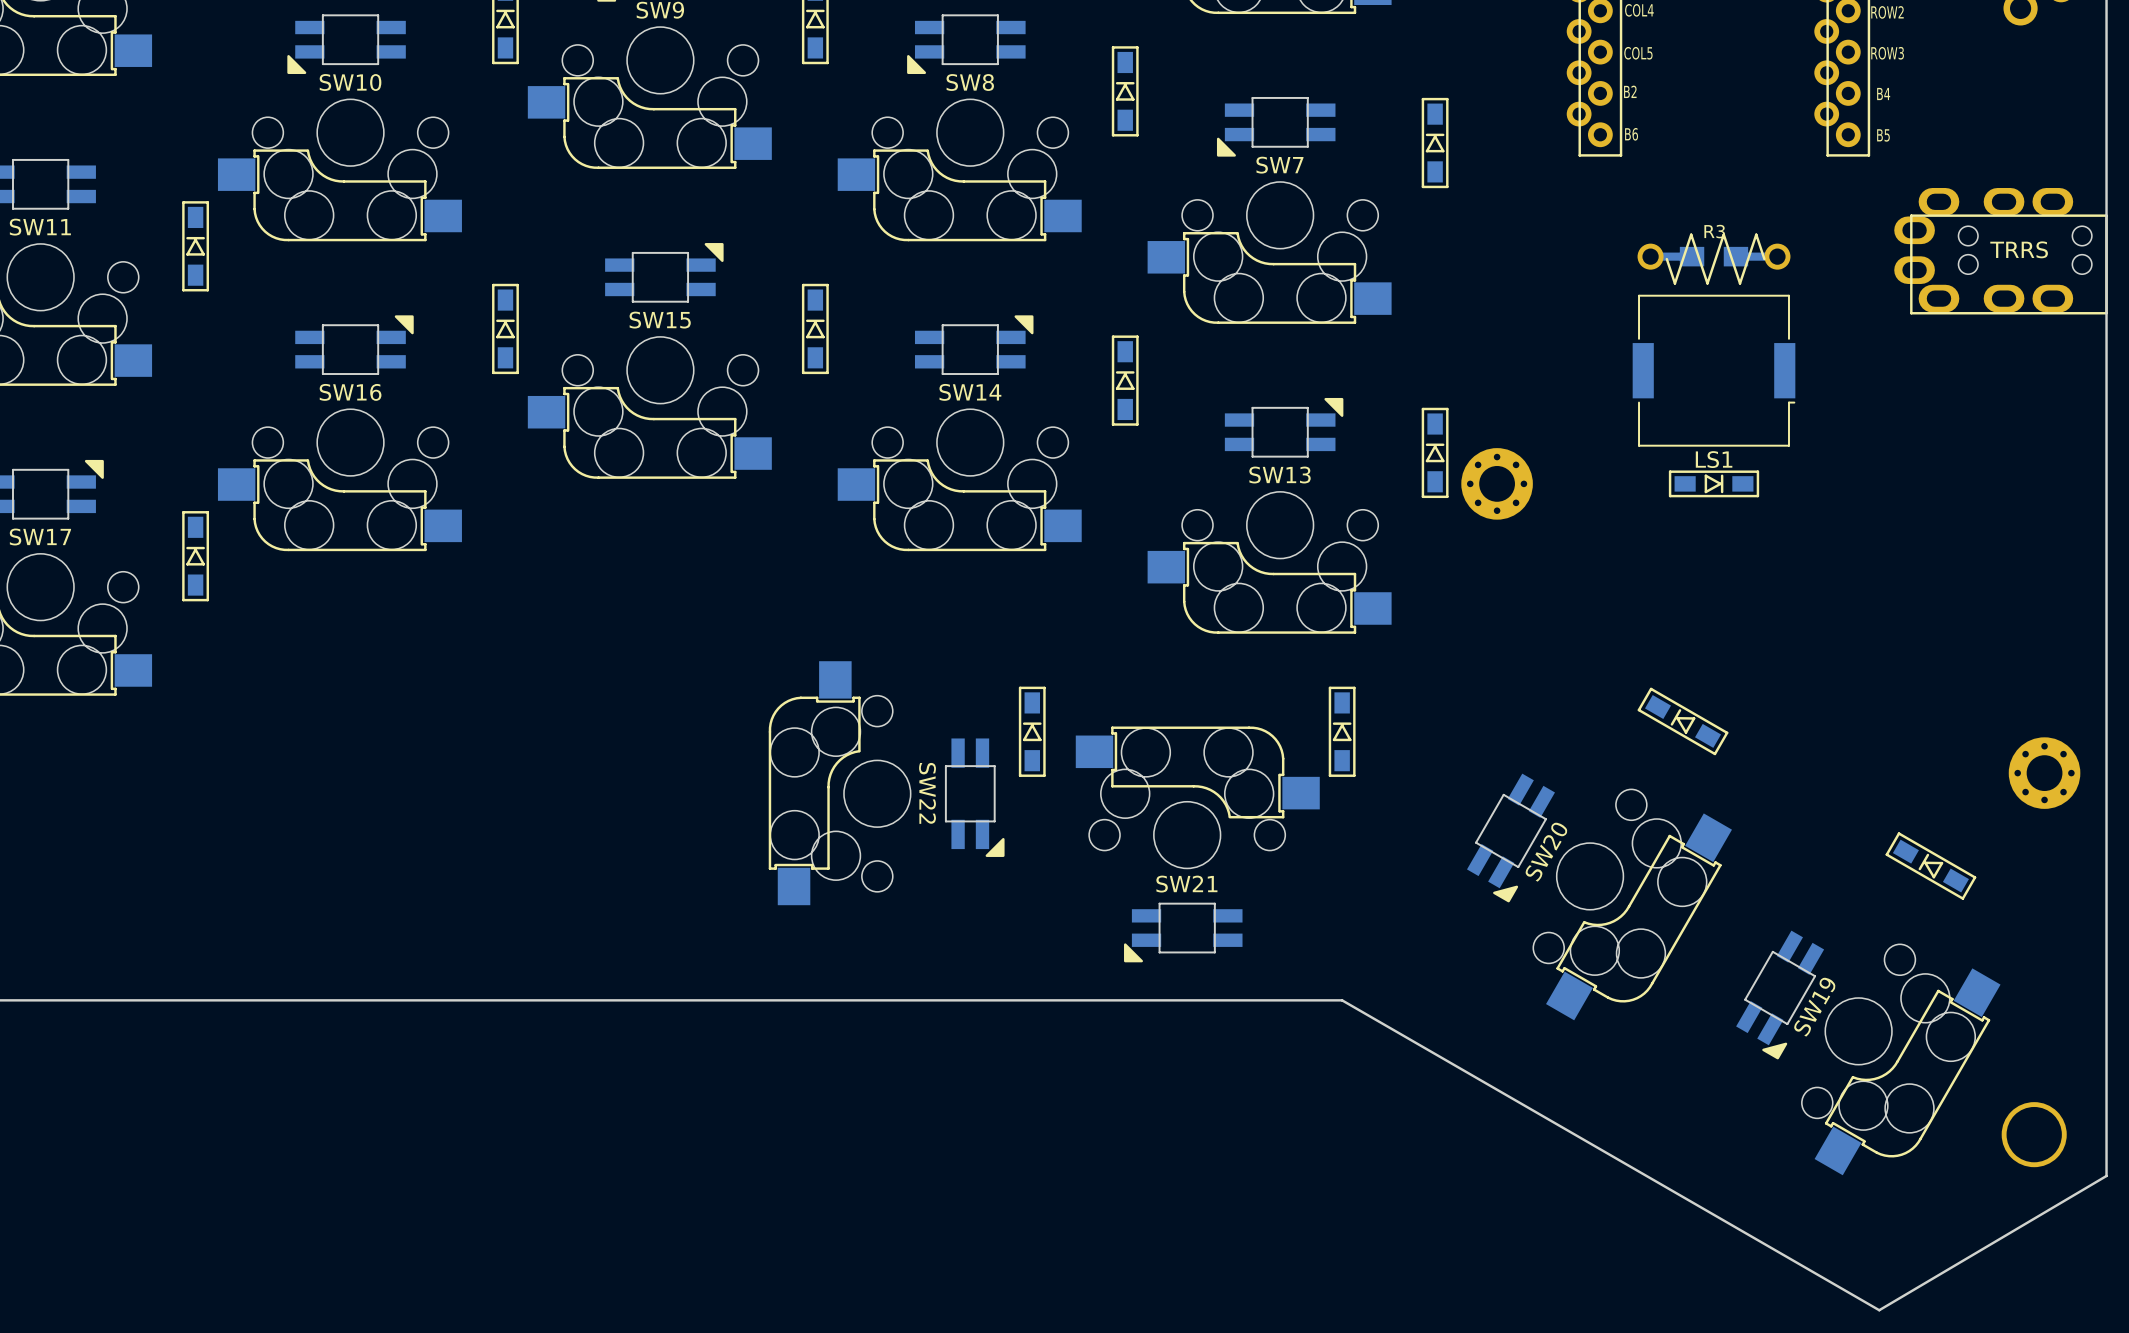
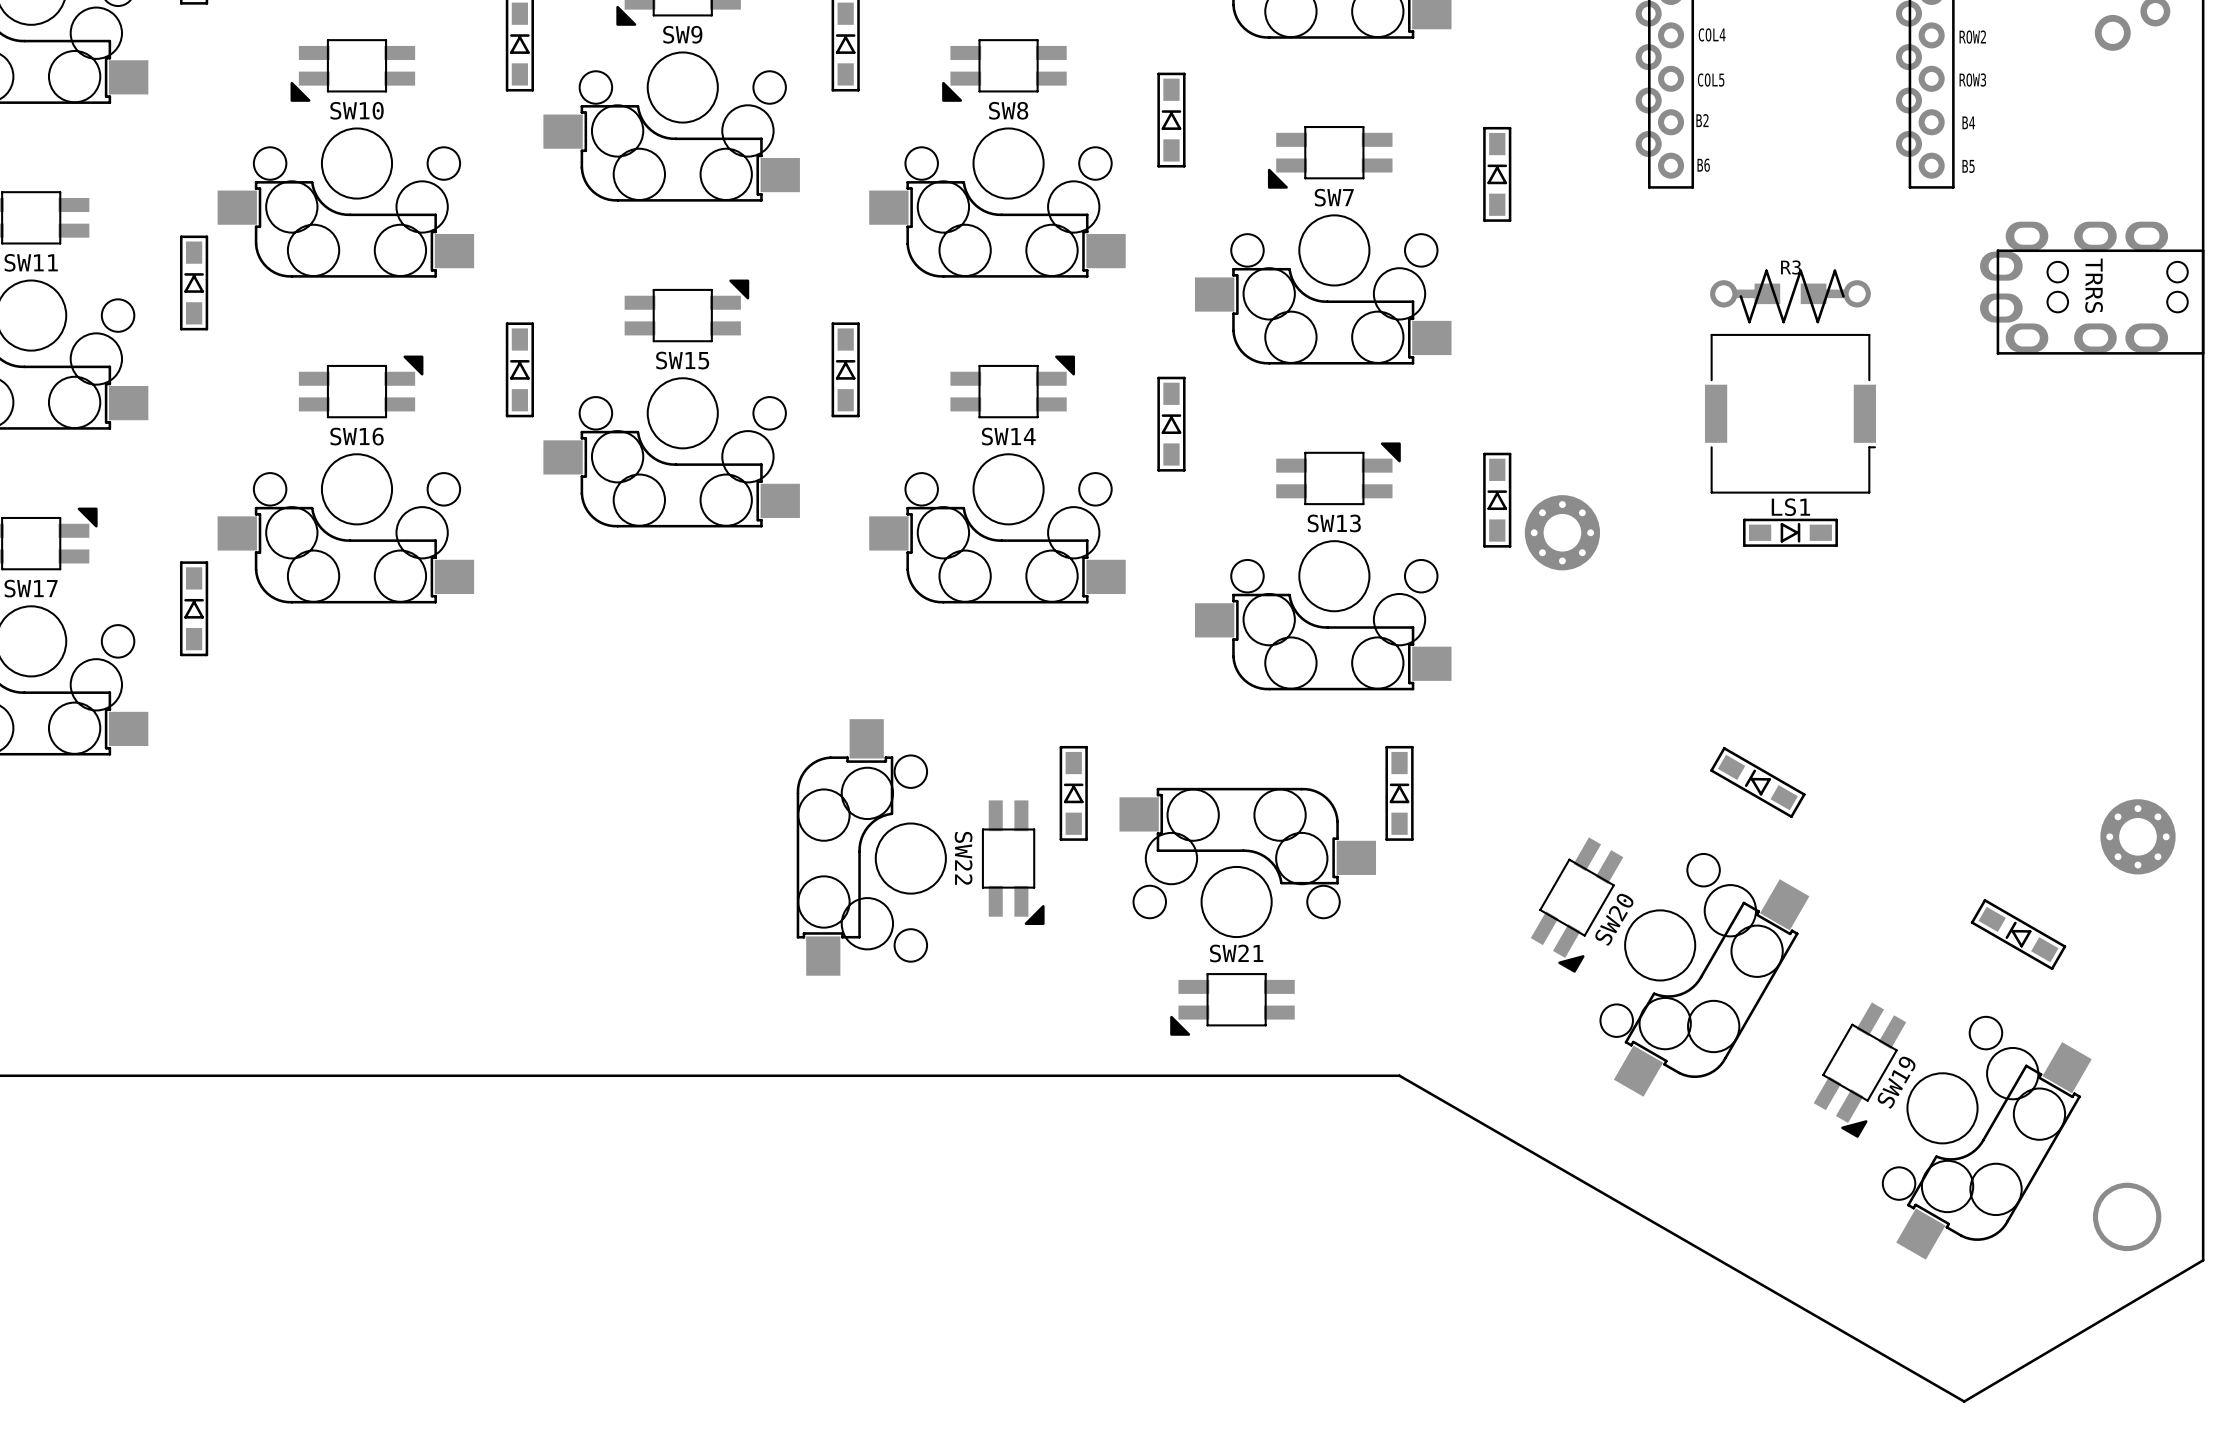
part text rotation: 0° (2019, 249) -> 90° clockwise (2094, 285)

